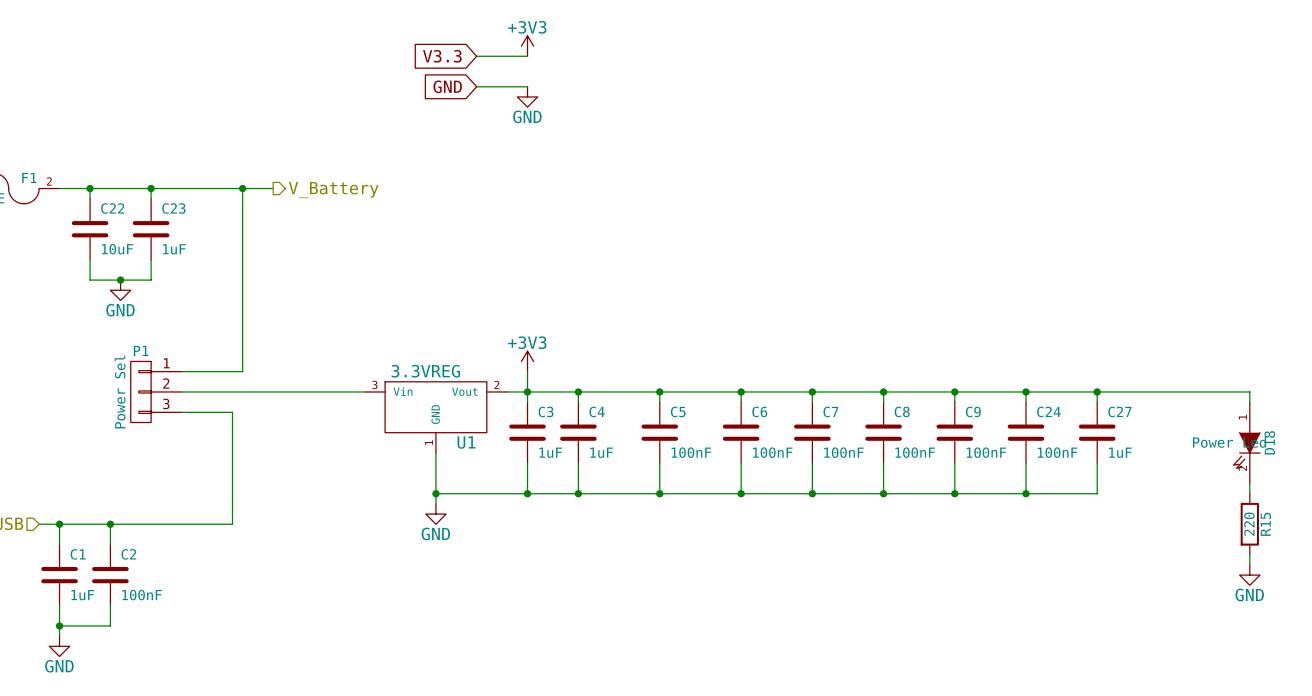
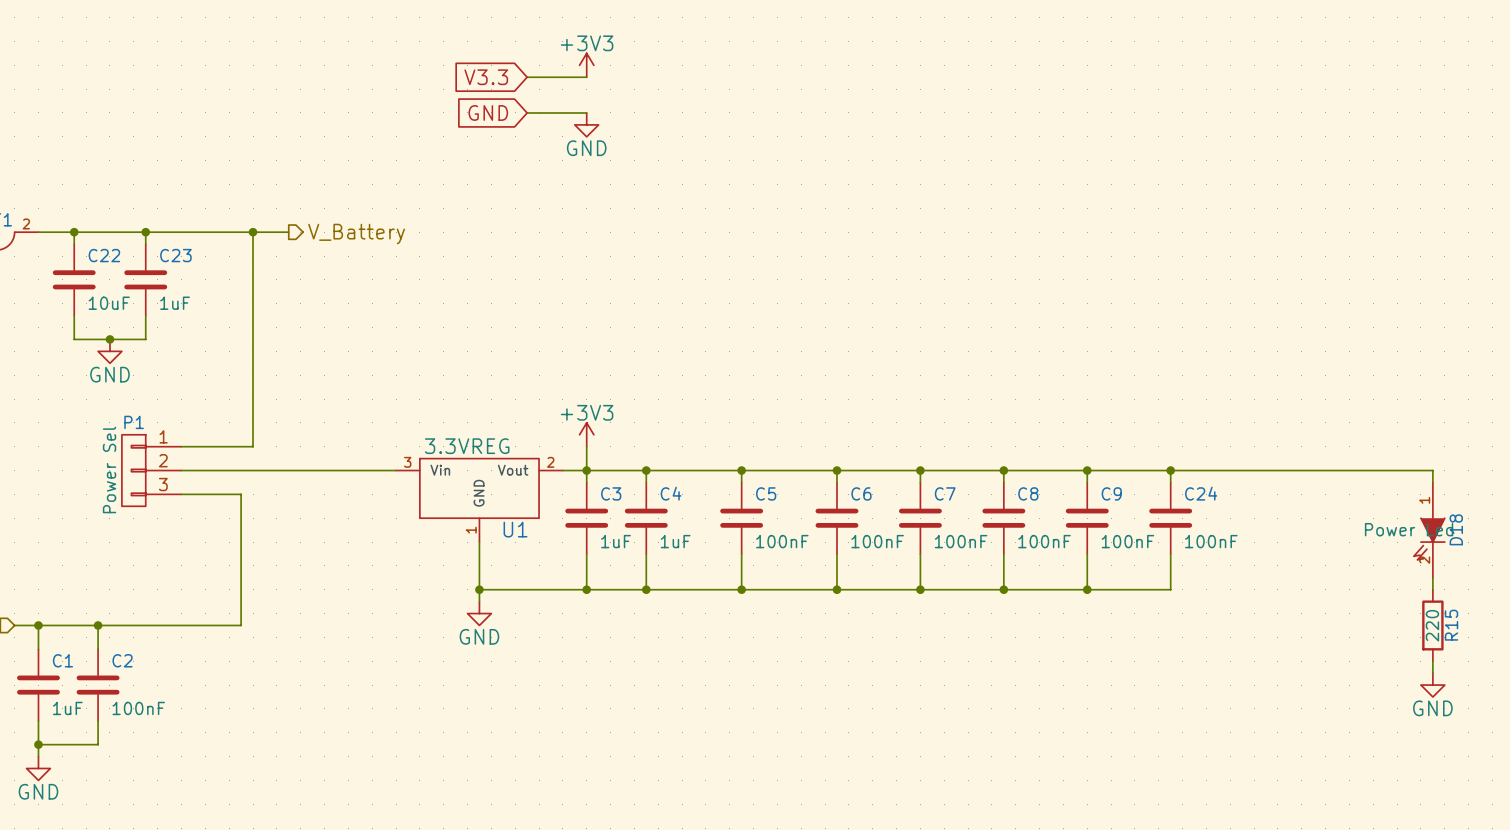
wire: (1097, 391) (1097, 402) -> none
junction: (1097, 391) -> none
C27: 1uF (1097, 432) -> none
wire: (1097, 463) (1097, 493) (1026, 493) -> none
junction: (1026, 493) -> none

